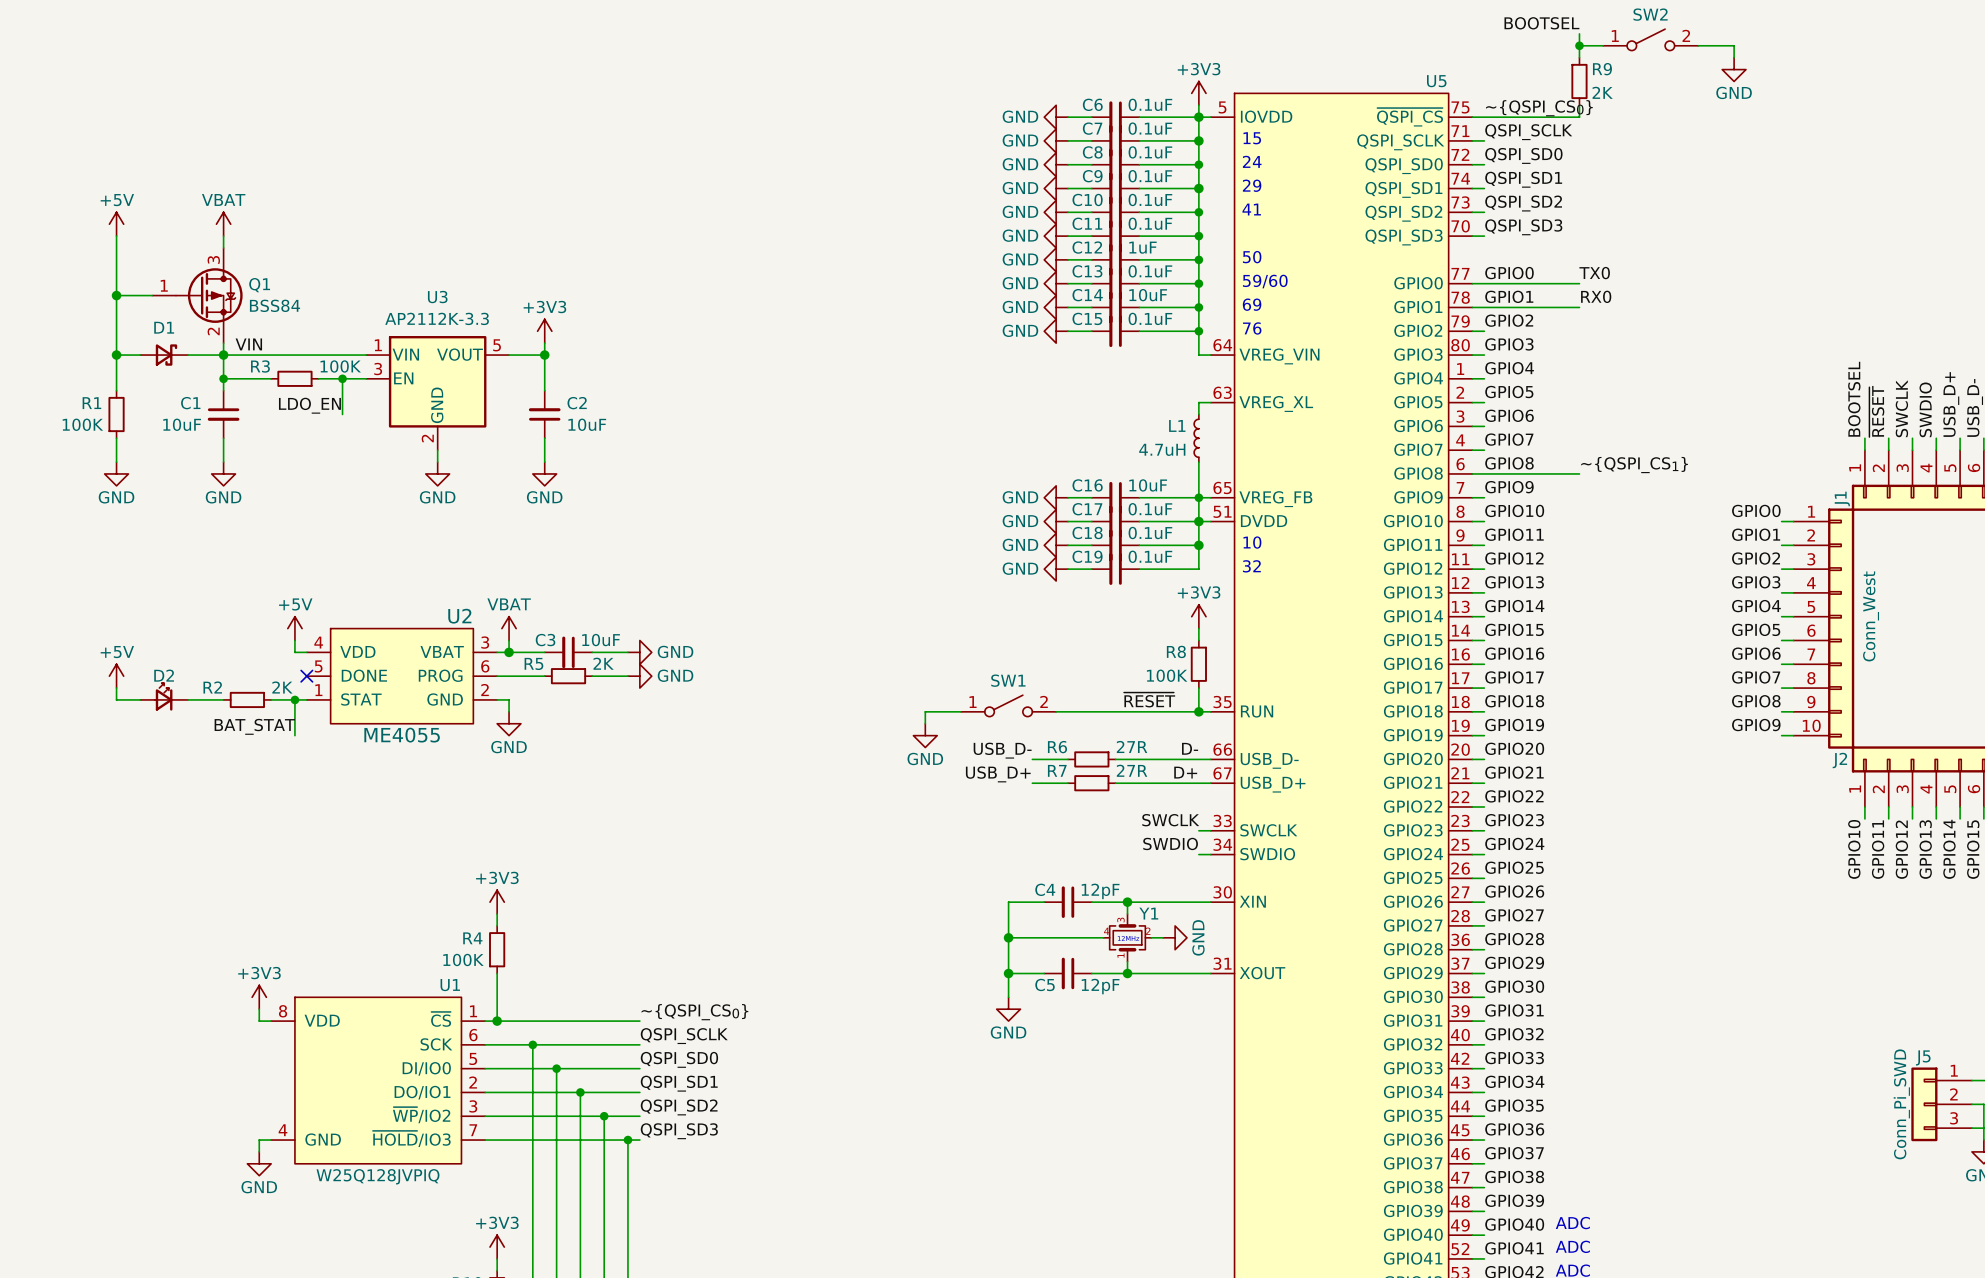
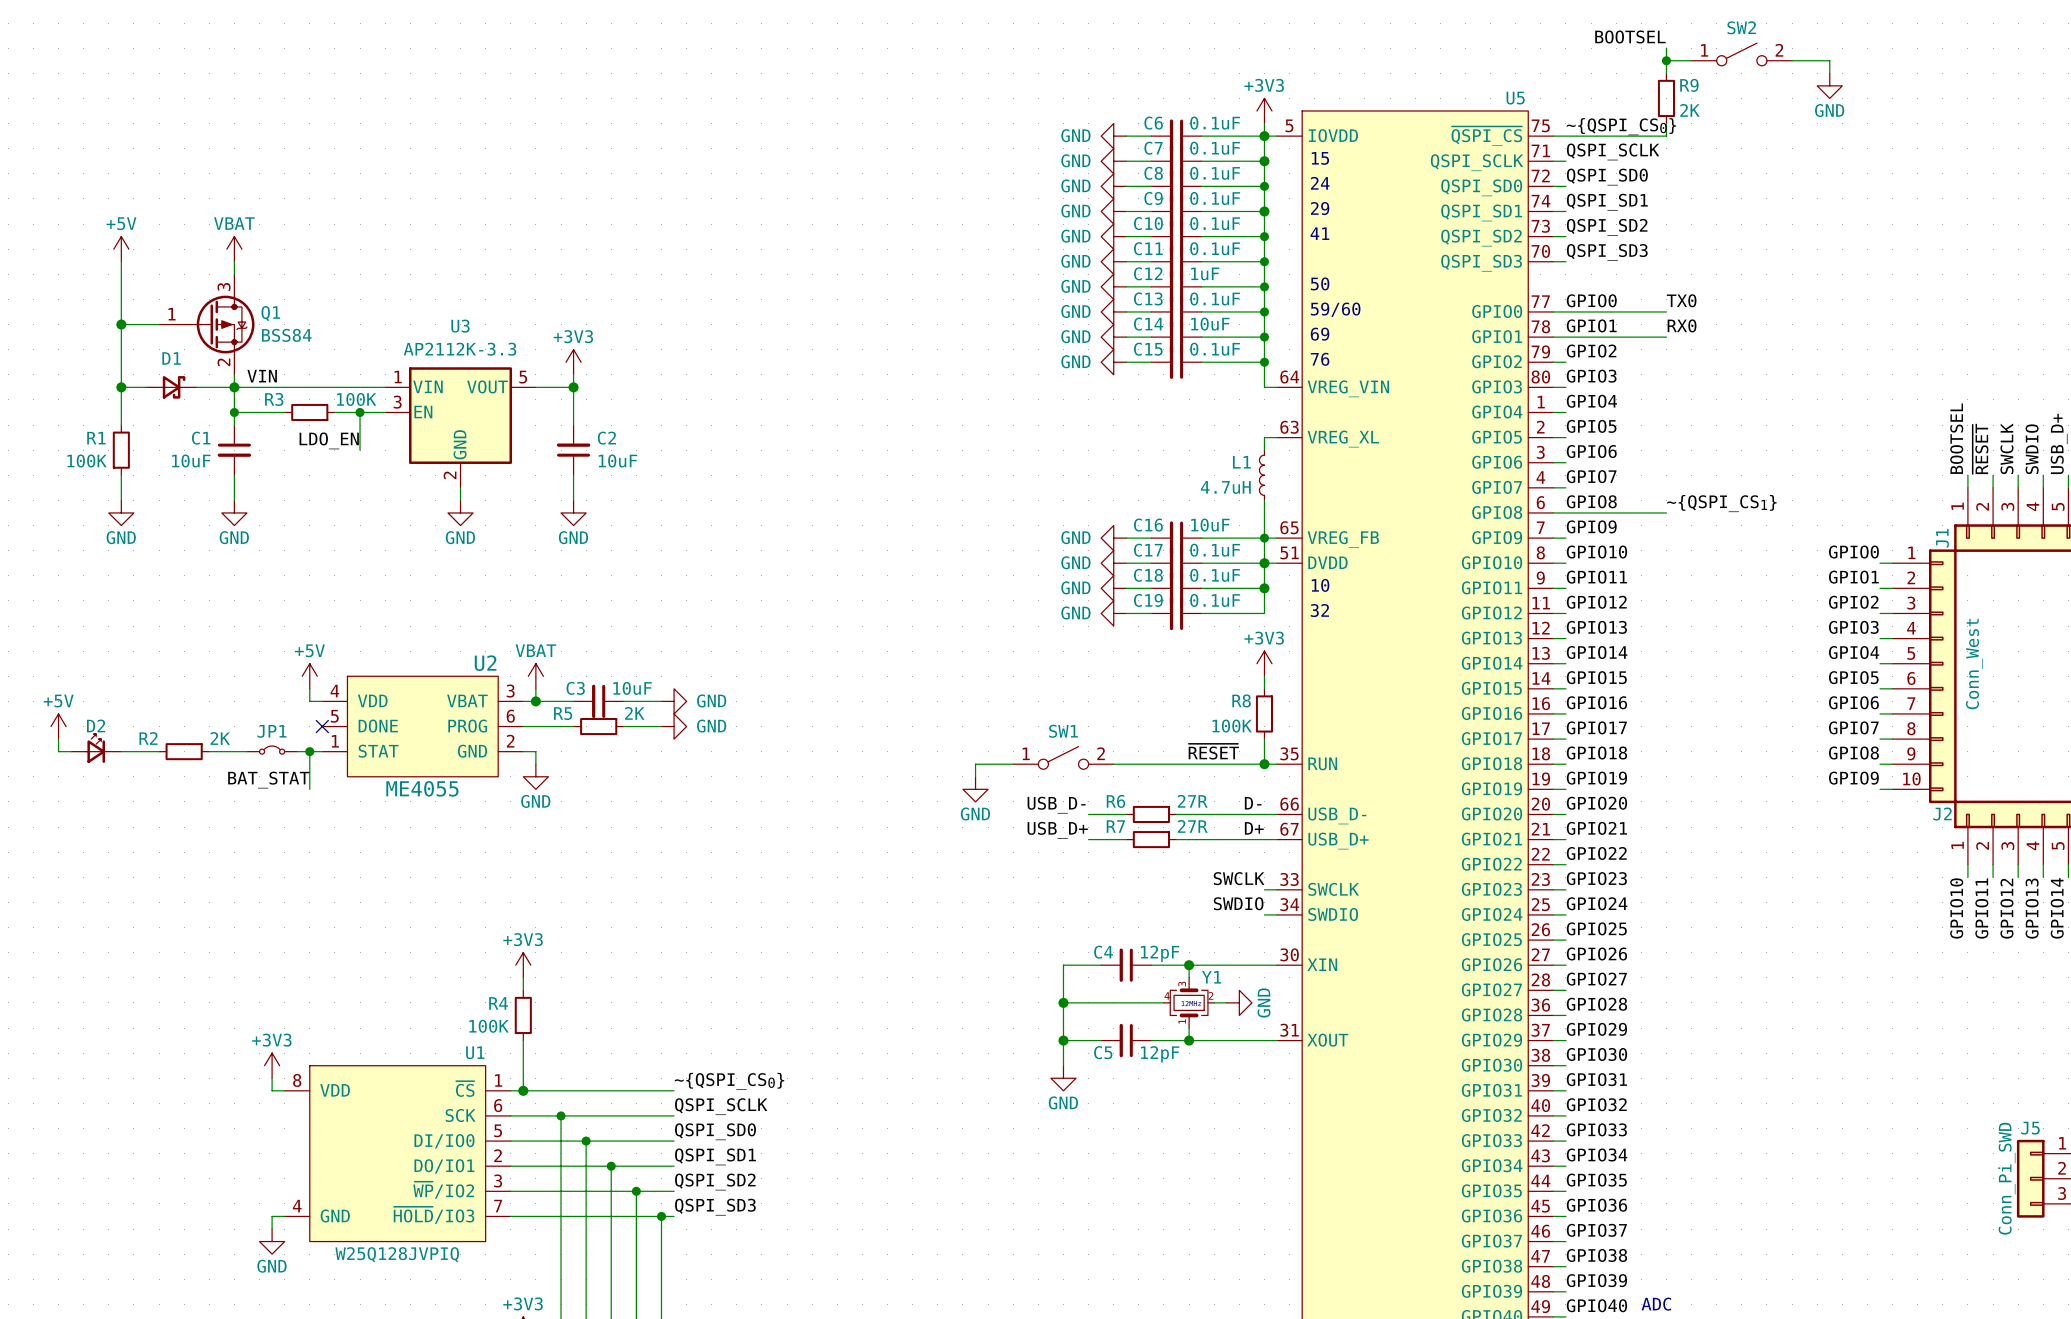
power symbol position: +5V (116, 676) -> +5V (58, 726)
wire: none -> (58, 739) (58, 751) (71, 751)
wire: (116, 688) (116, 699) -> none
D2 position: (164, 696) -> (96, 748)
JP1: none -> (272, 750)
R2 position: (247, 699) -> (184, 751)

